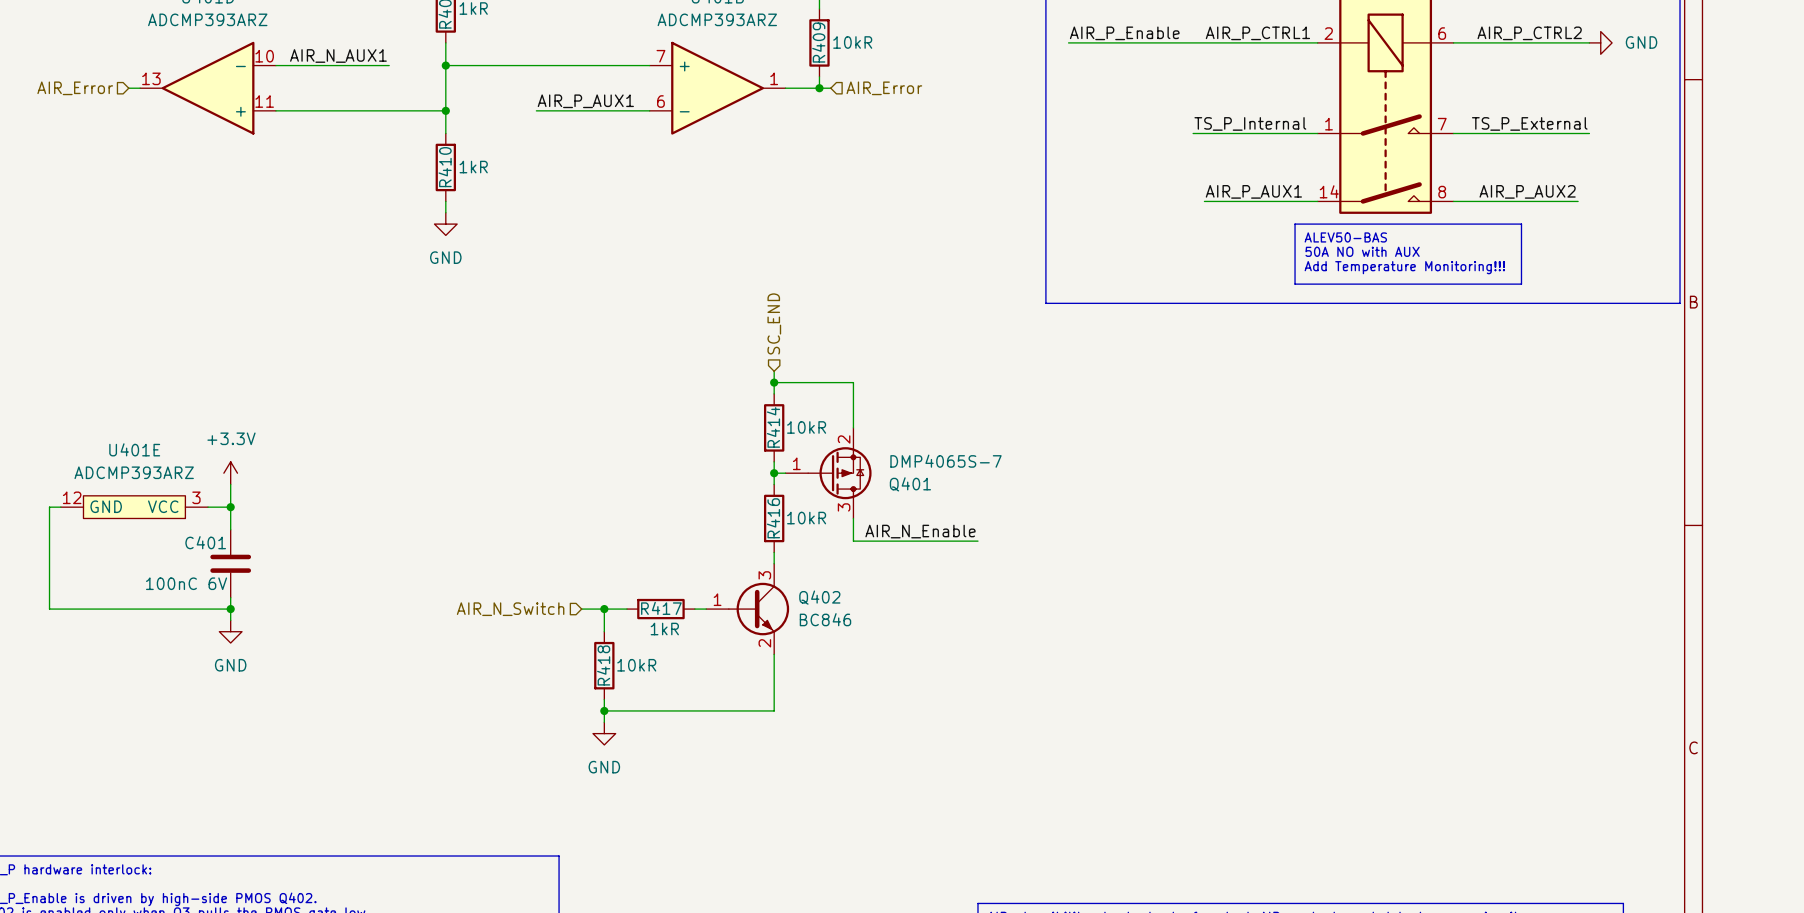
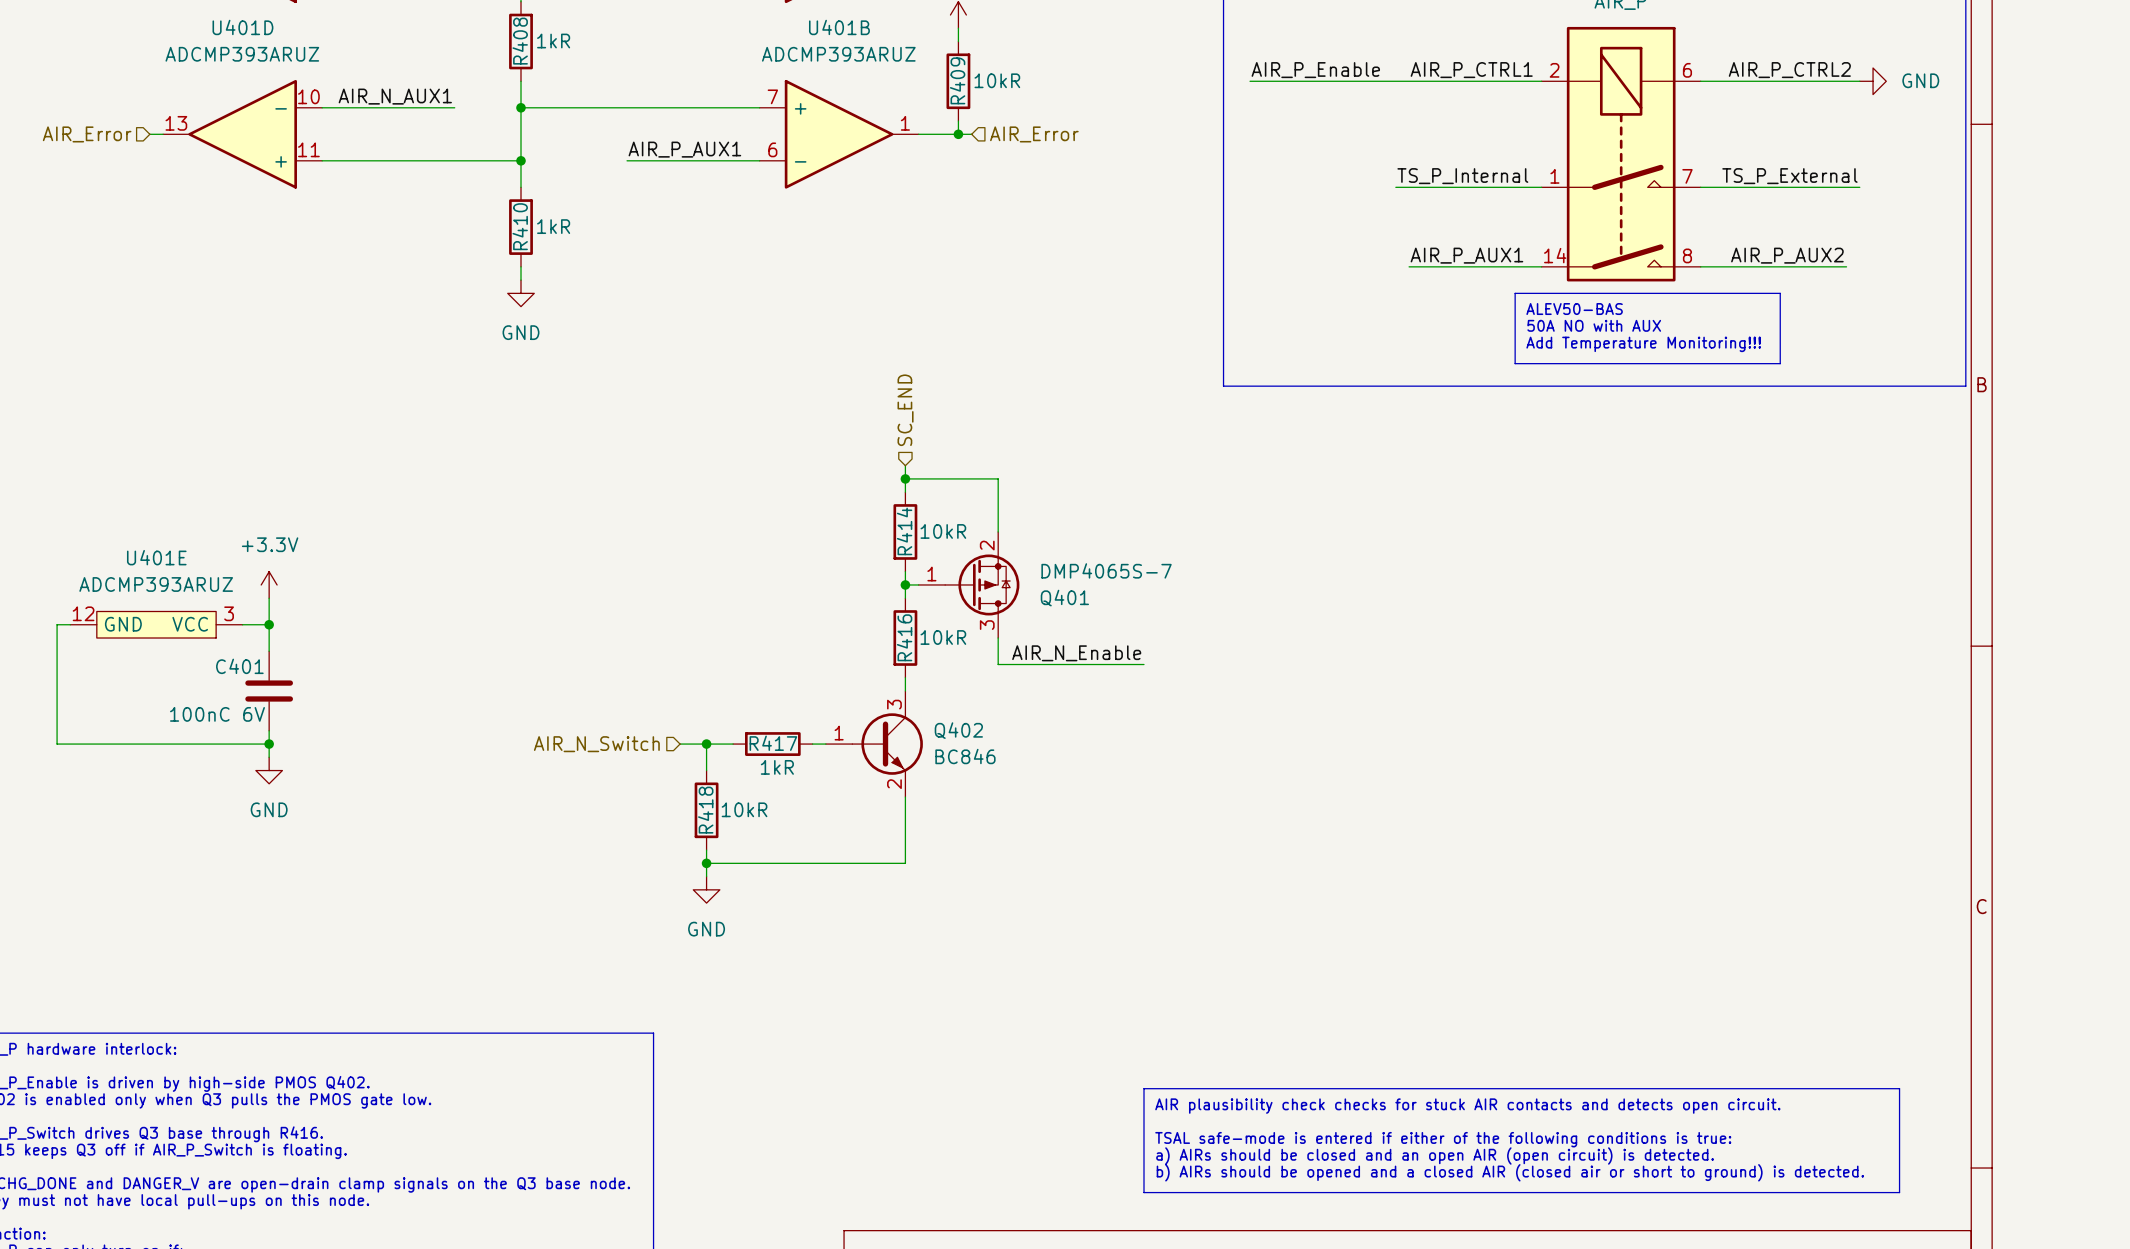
U401D value: ADCMP393ARZ (207, 19) -> ADCMP393ARUZ (242, 54)
U401B value: ADCMP393ARZ (717, 19) -> ADCMP393ARUZ (838, 54)
U401E value: ADCMP393ARZ (134, 472) -> ADCMP393ARUZ (156, 584)

